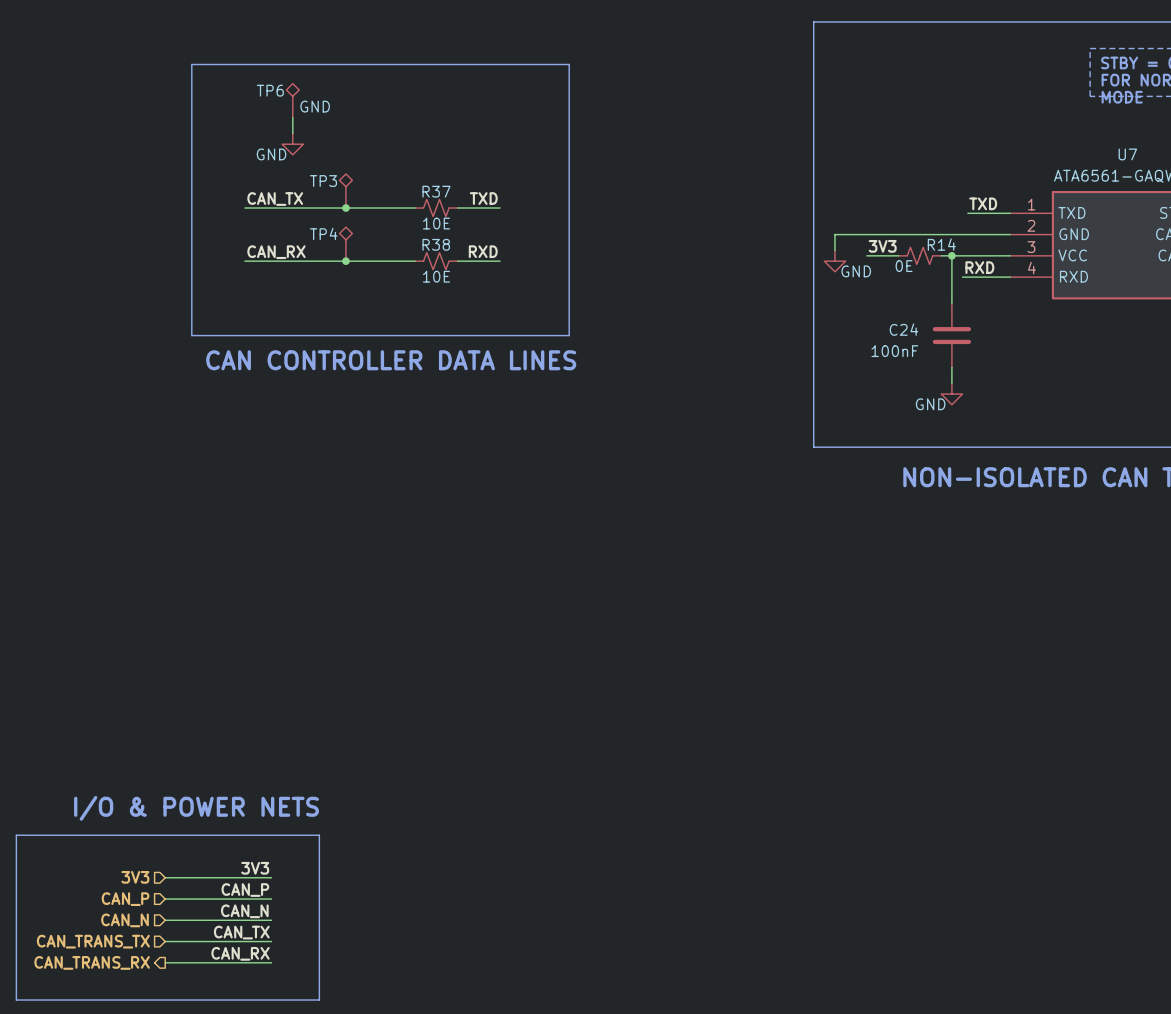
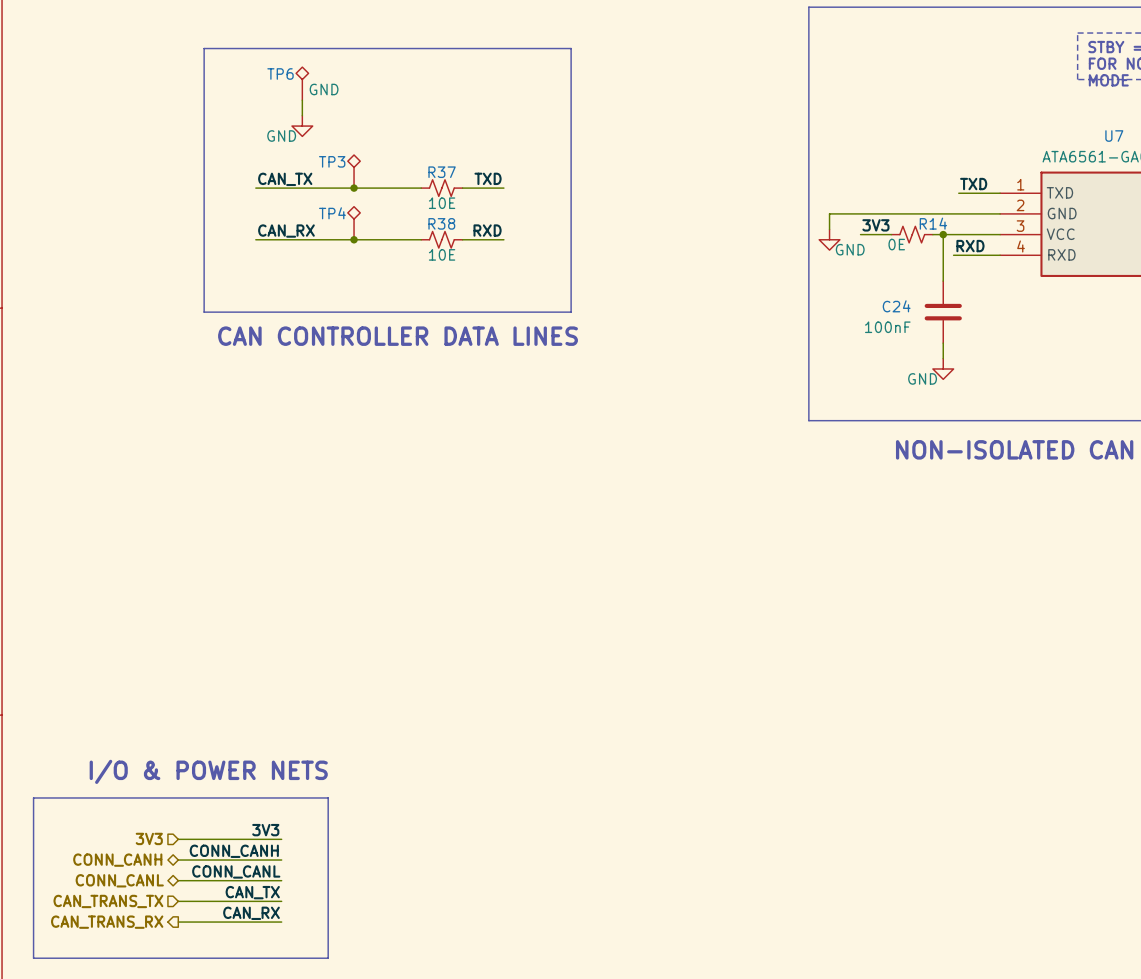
label: CAN_P (245, 890) -> CONN_CANH (234, 851)
hierarchical label shape: input (125, 899) -> bidirectional (117, 860)
hierarchical label: CAN_P (125, 899) -> CONN_CANH (117, 860)
label: CAN_N (244, 911) -> CONN_CANL (236, 871)
hierarchical label shape: input (125, 920) -> bidirectional (119, 880)
hierarchical label: CAN_N (125, 920) -> CONN_CANL (119, 880)

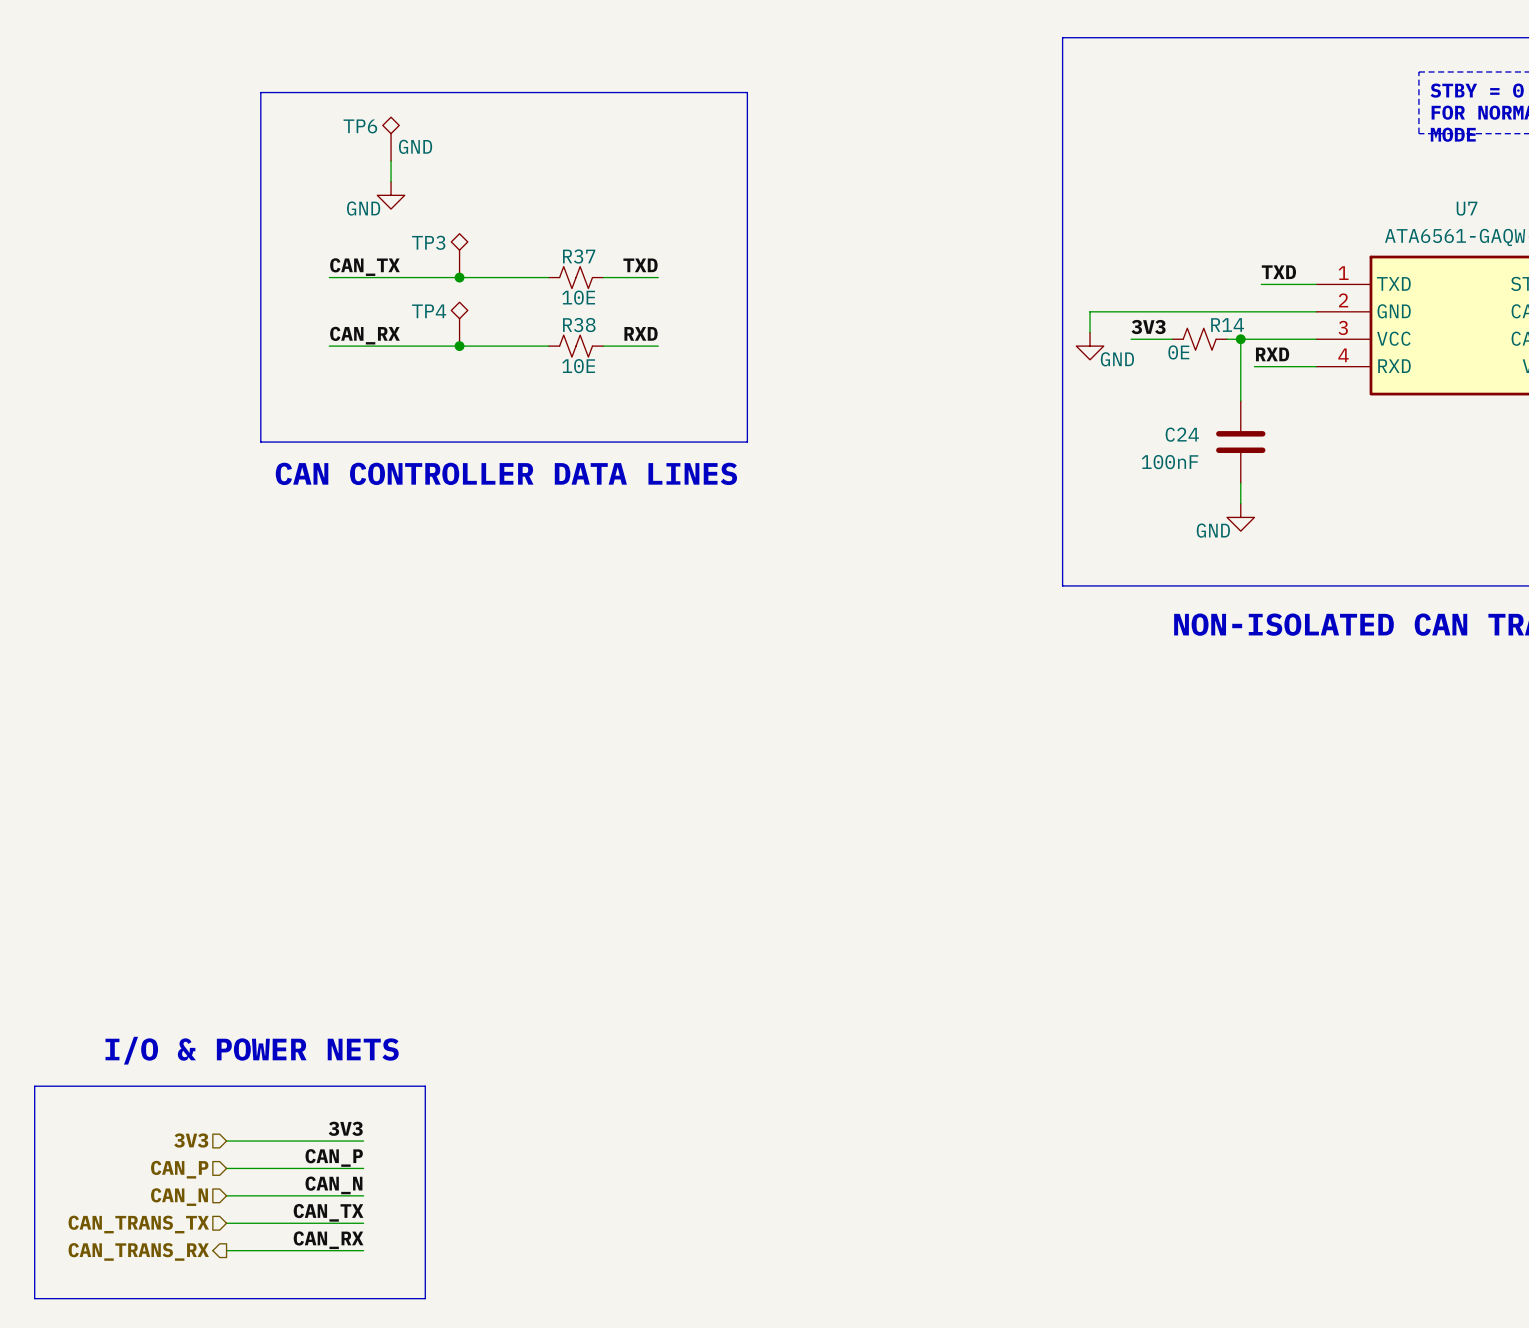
label: CONN_CANH (234, 851) -> CAN_P (334, 1157)
hierarchical label shape: bidirectional (117, 860) -> input (179, 1169)
hierarchical label: CONN_CANH (117, 860) -> CAN_P (179, 1169)
label: CONN_CANL (236, 871) -> CAN_N (333, 1185)
hierarchical label shape: bidirectional (119, 880) -> input (179, 1197)
hierarchical label: CONN_CANL (119, 880) -> CAN_N (179, 1197)

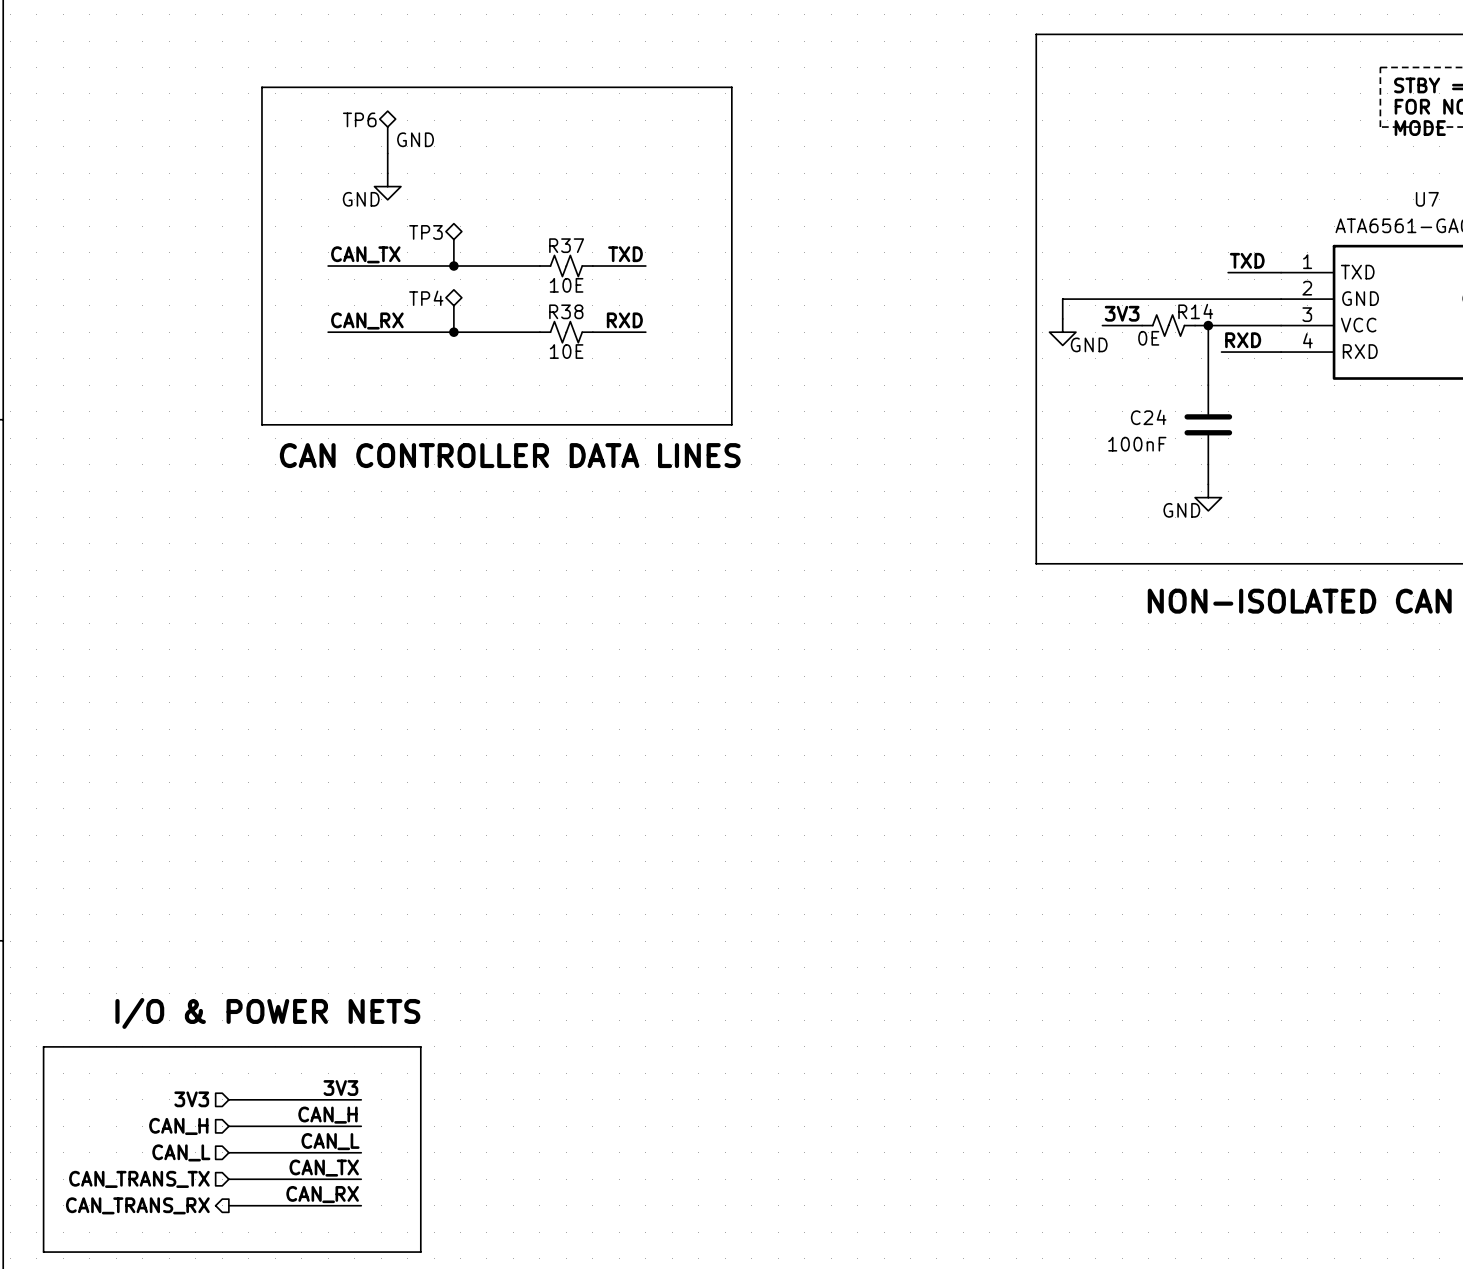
label: CAN_P (334, 1157) -> CAN_H (327, 1115)
hierarchical label: CAN_P (179, 1169) -> CAN_H (178, 1126)
label: CAN_N (333, 1185) -> CAN_L (330, 1141)
hierarchical label: CAN_N (179, 1197) -> CAN_L (181, 1152)

